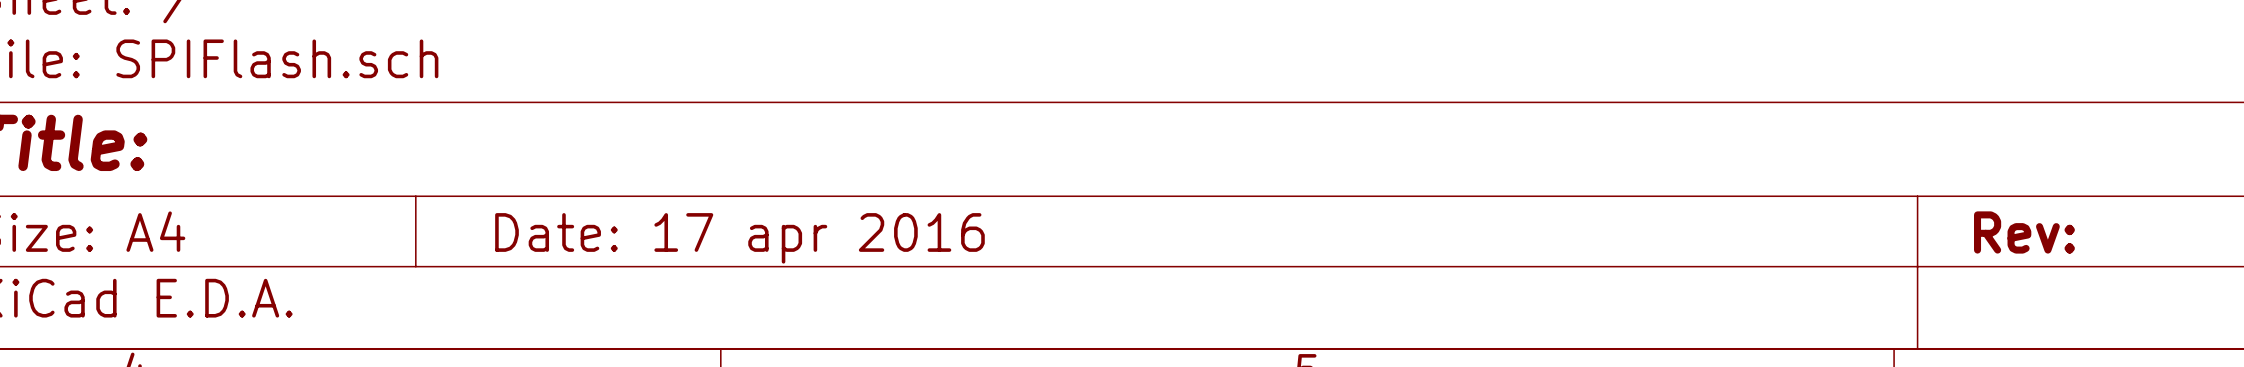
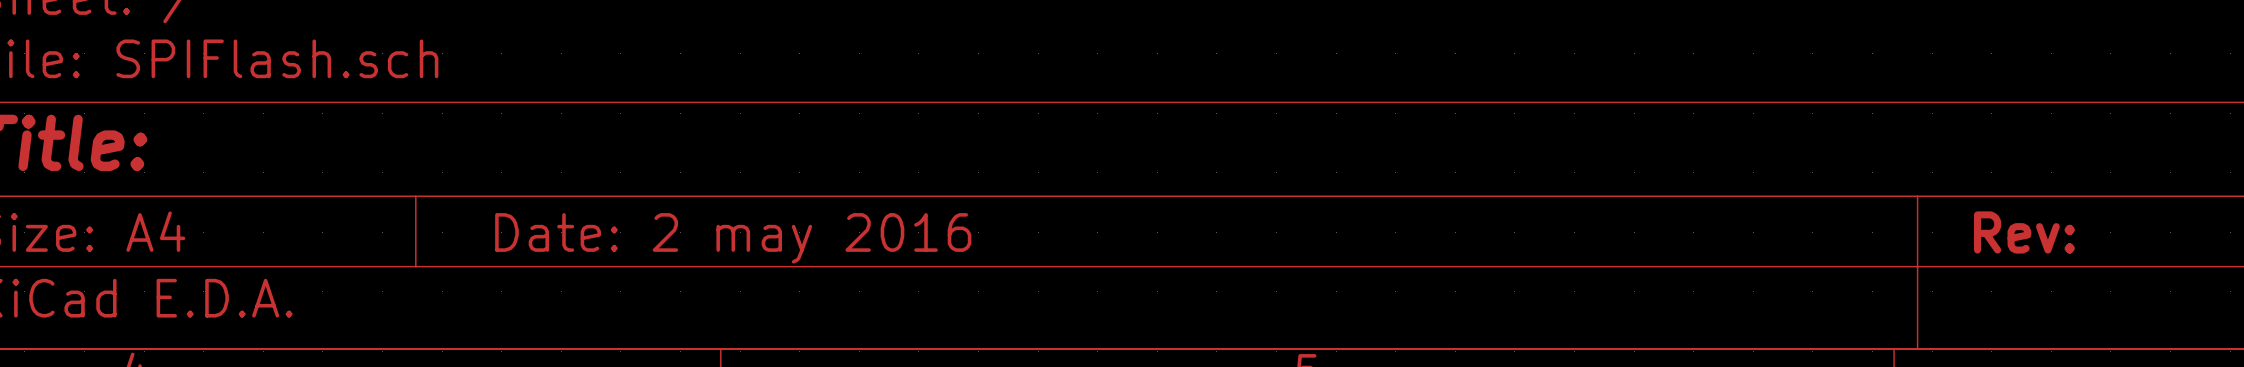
title block: Date: 17 apr 2016 (739, 238) -> Date: 2 may 2016 (733, 238)

